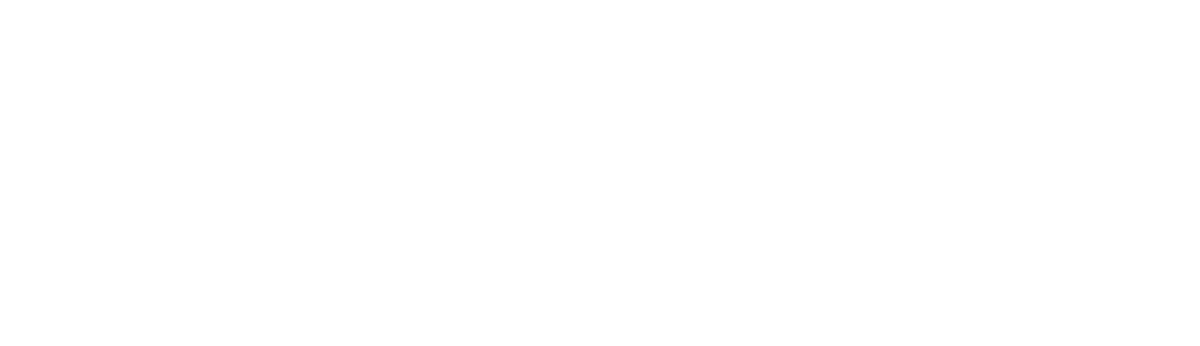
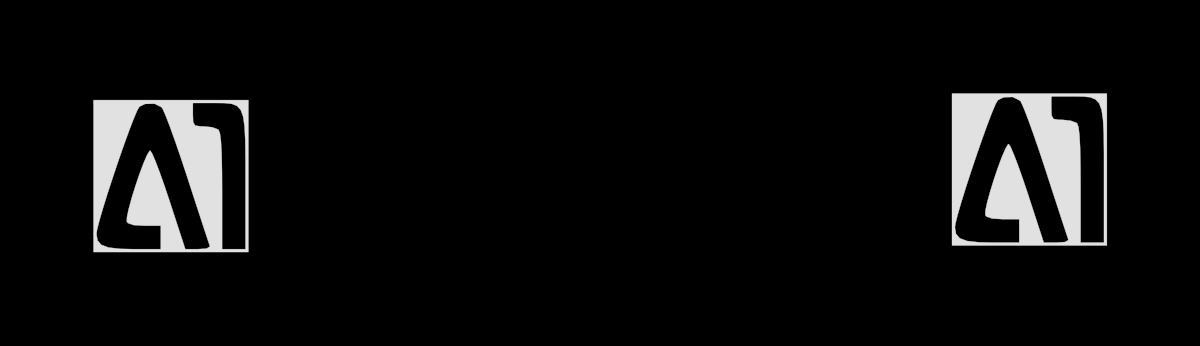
drawing: none -> [951, 93, 1108, 246]
drawing: none -> [93, 99, 249, 253]

